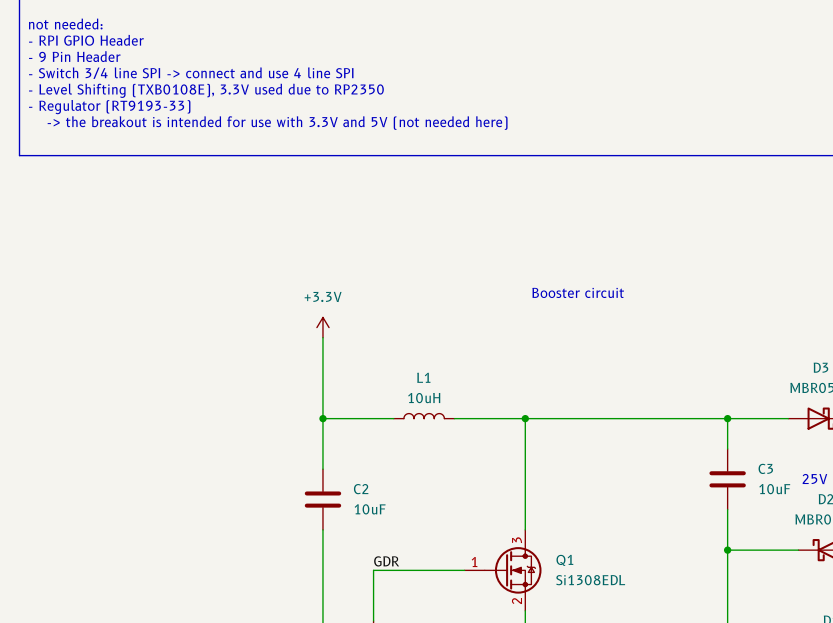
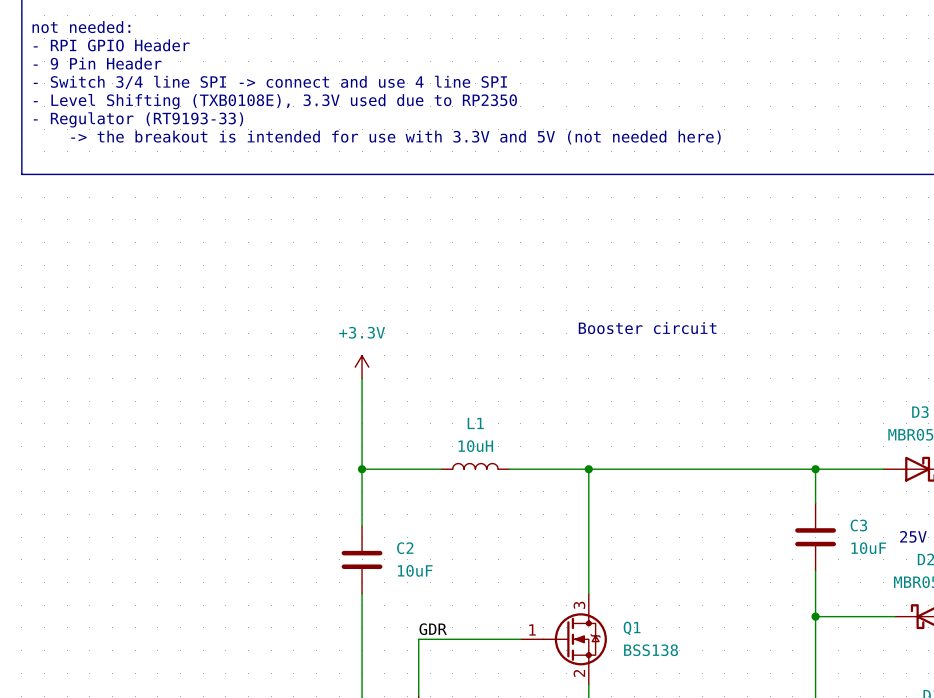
Q1 value: Si1308EDL (590, 580) -> BSS138 (651, 650)

